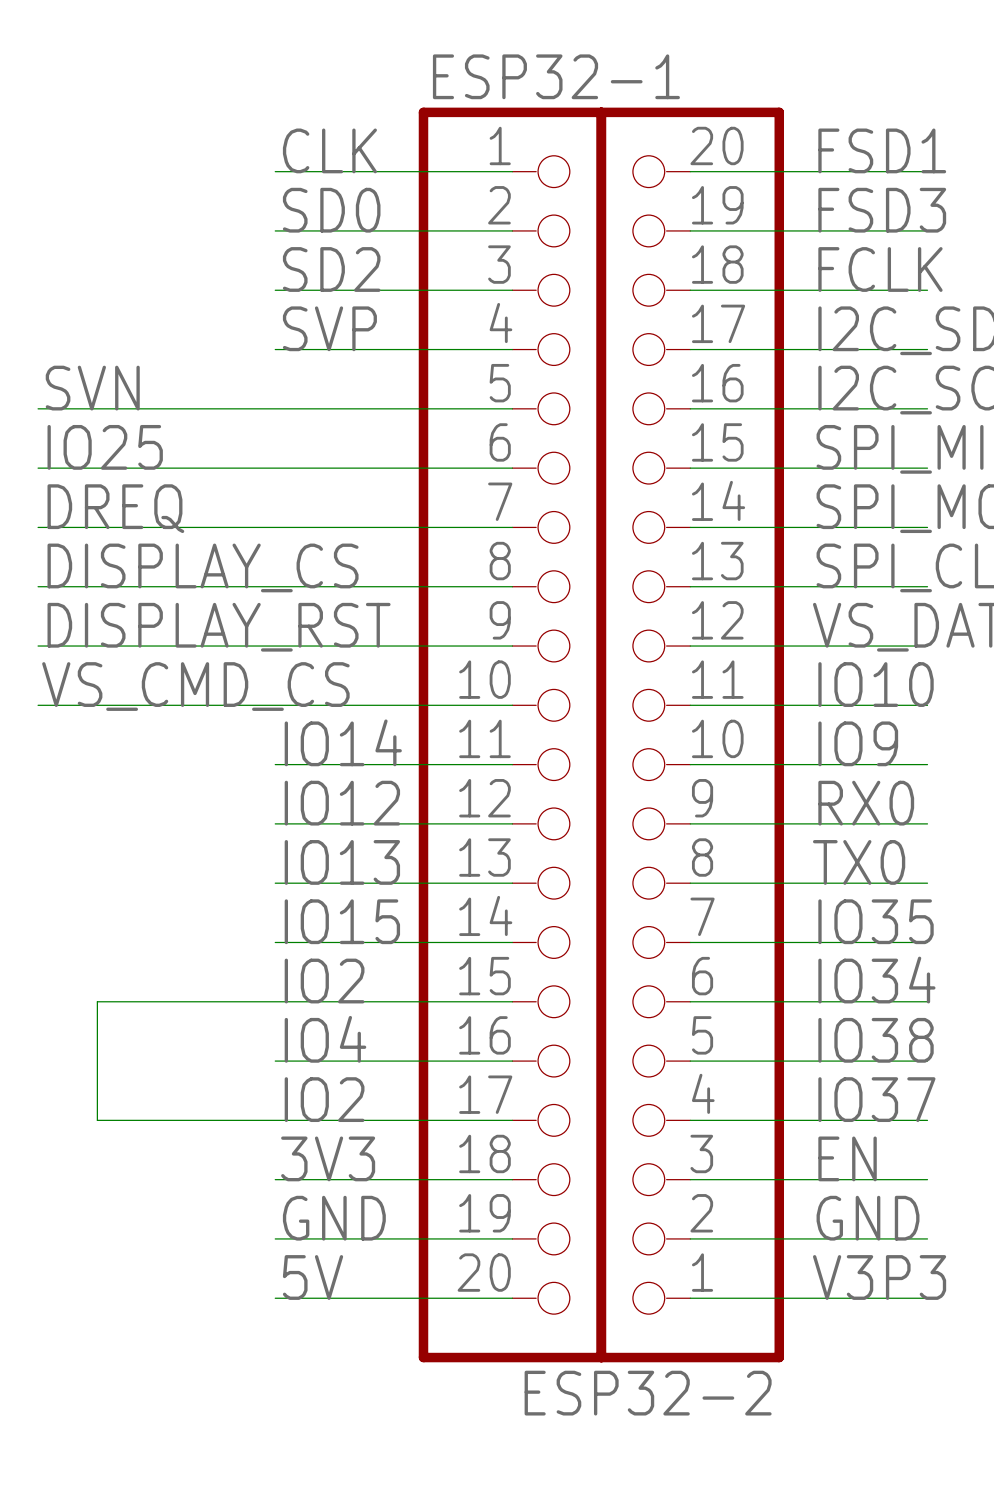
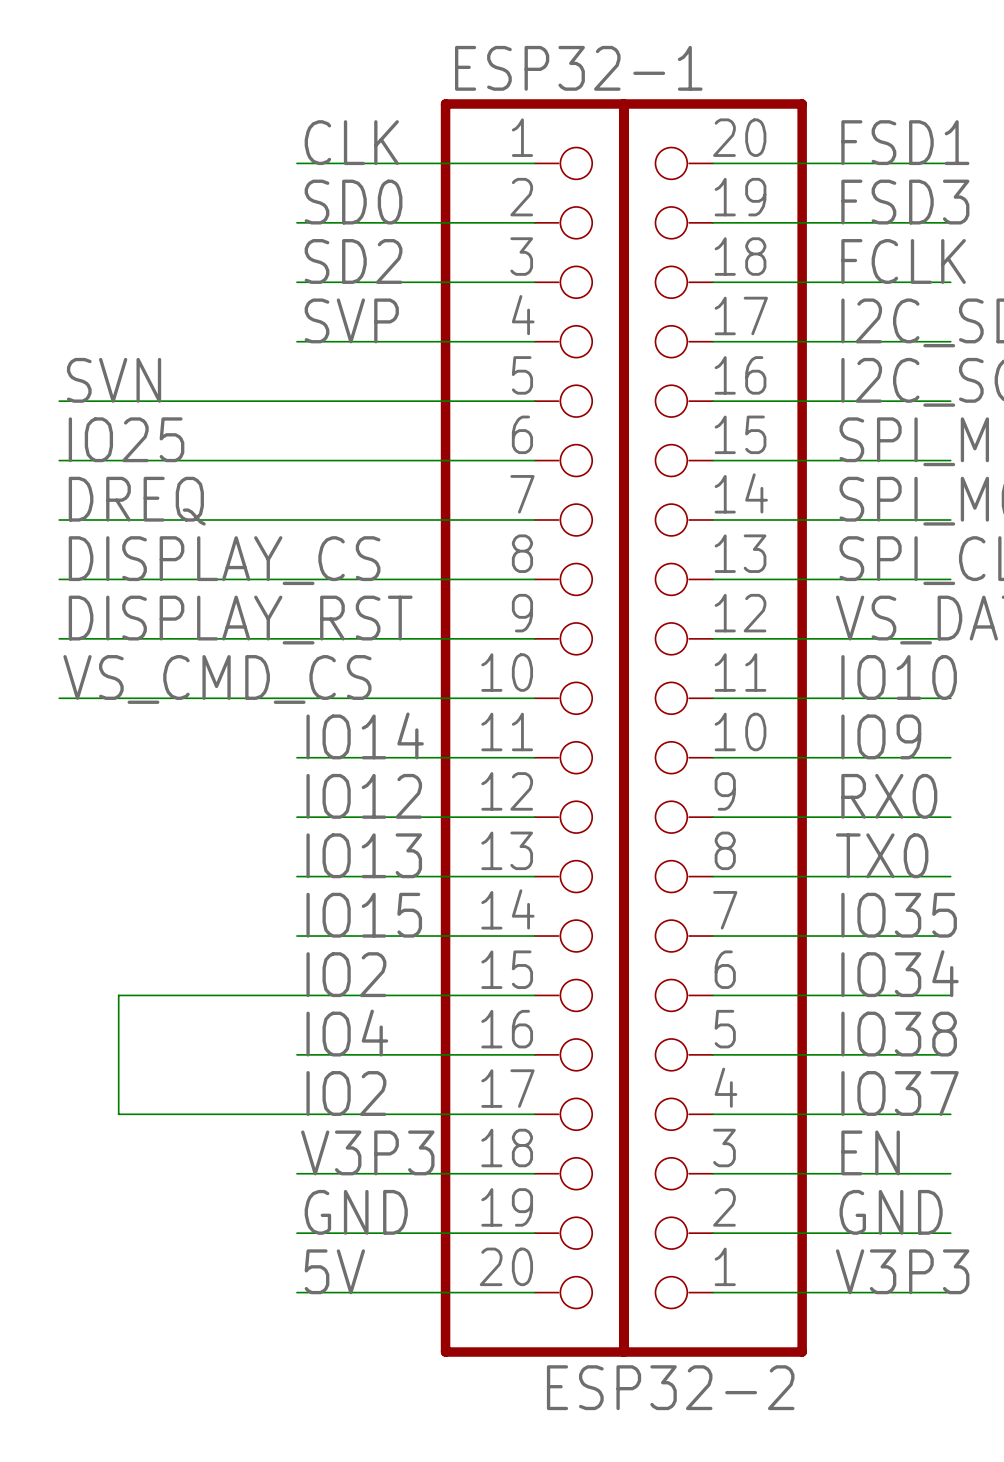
label: 3V3 (328, 1158) -> V3P3 (367, 1152)

